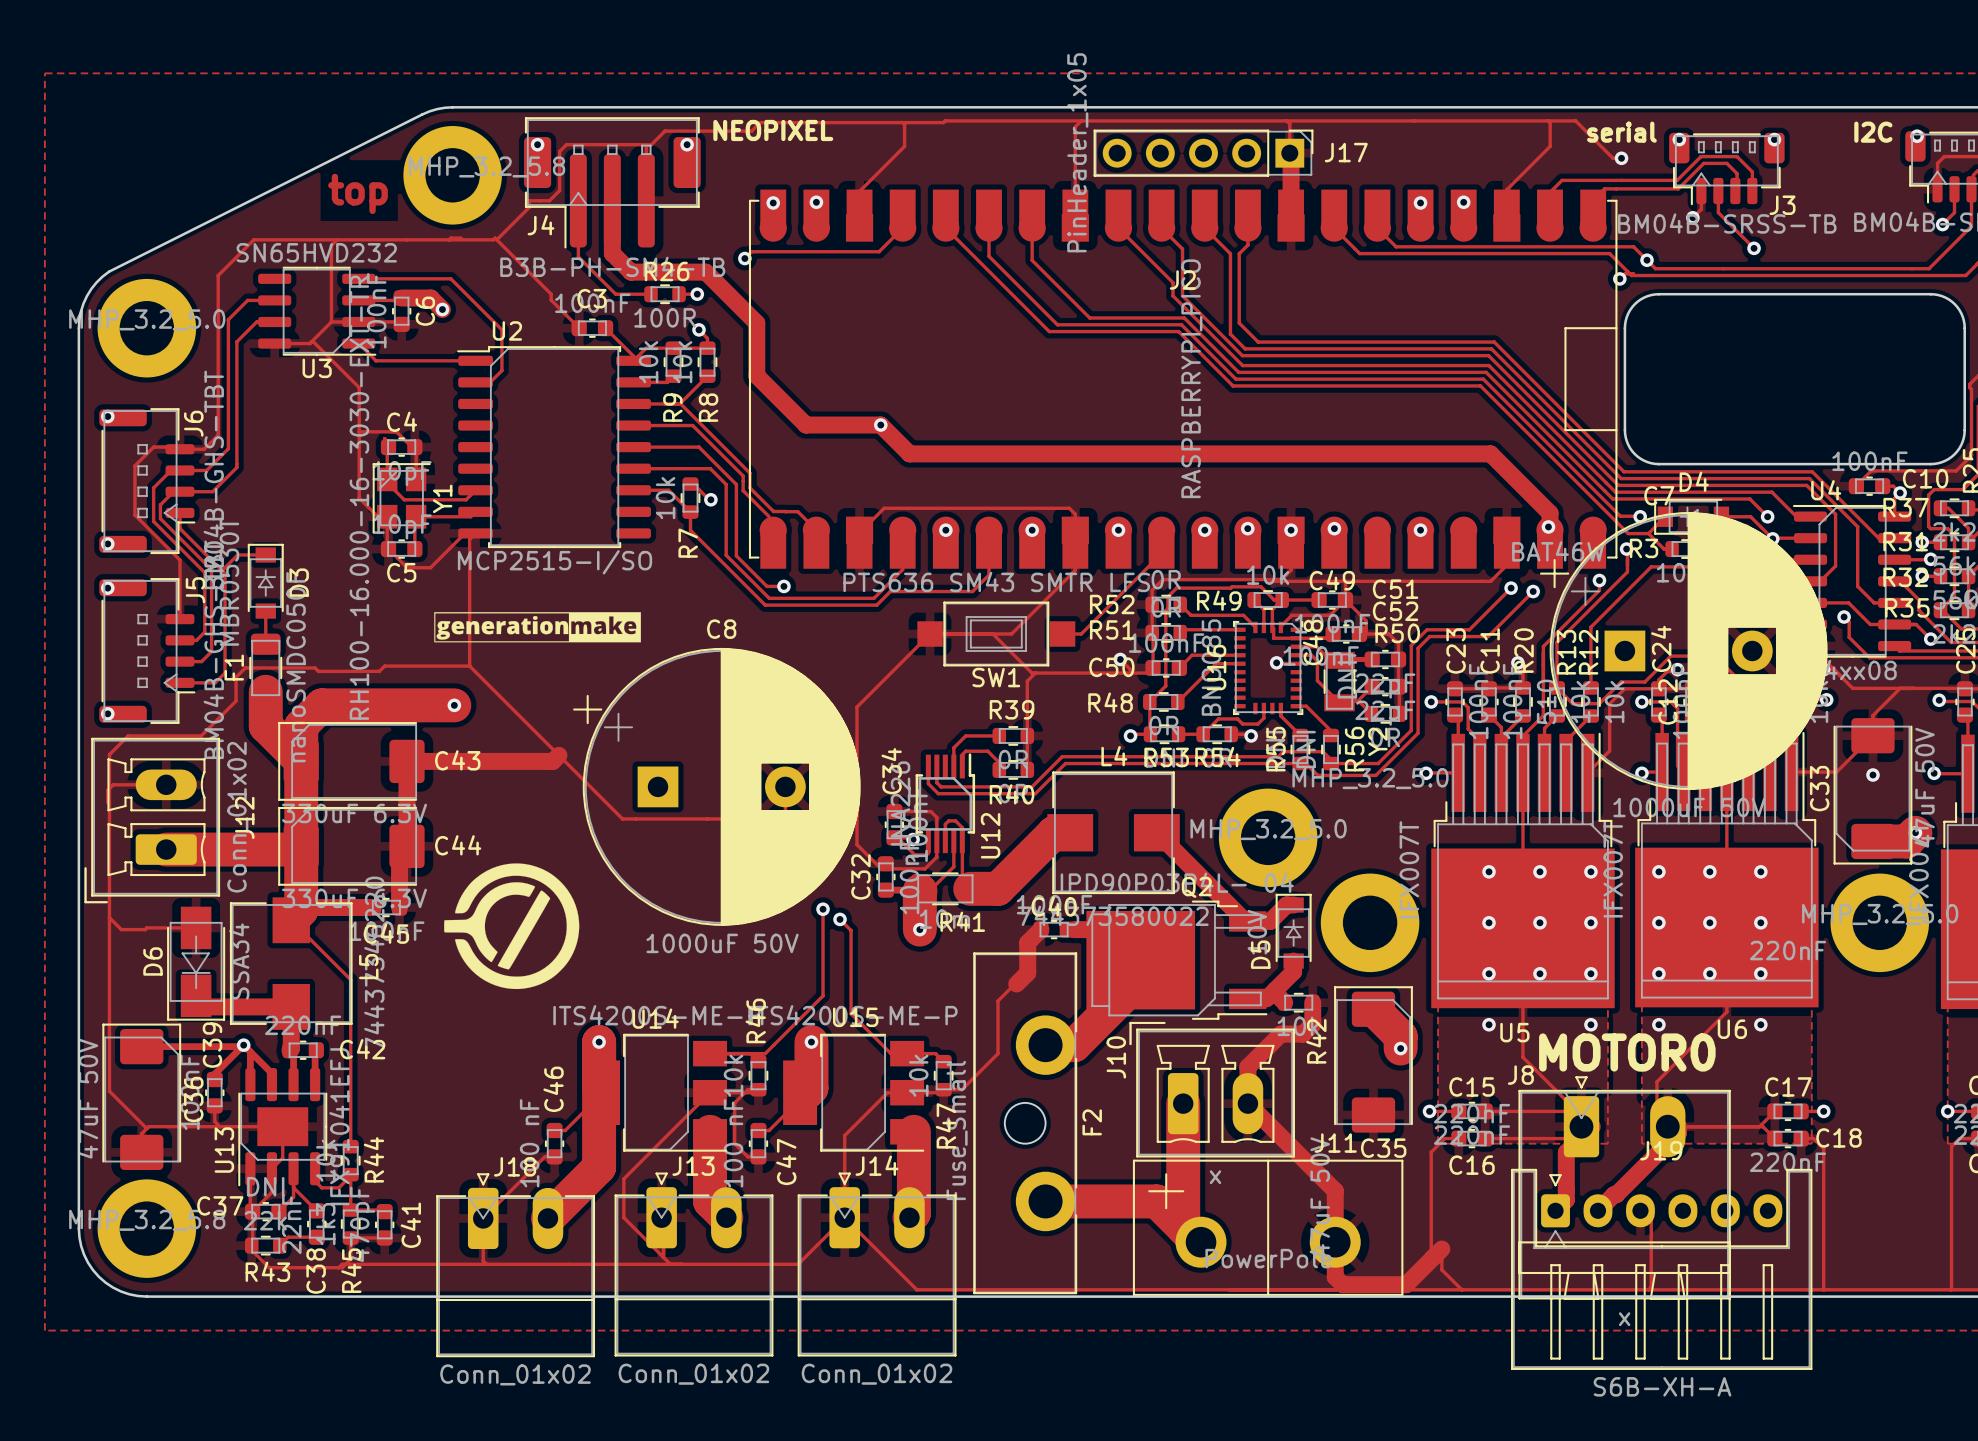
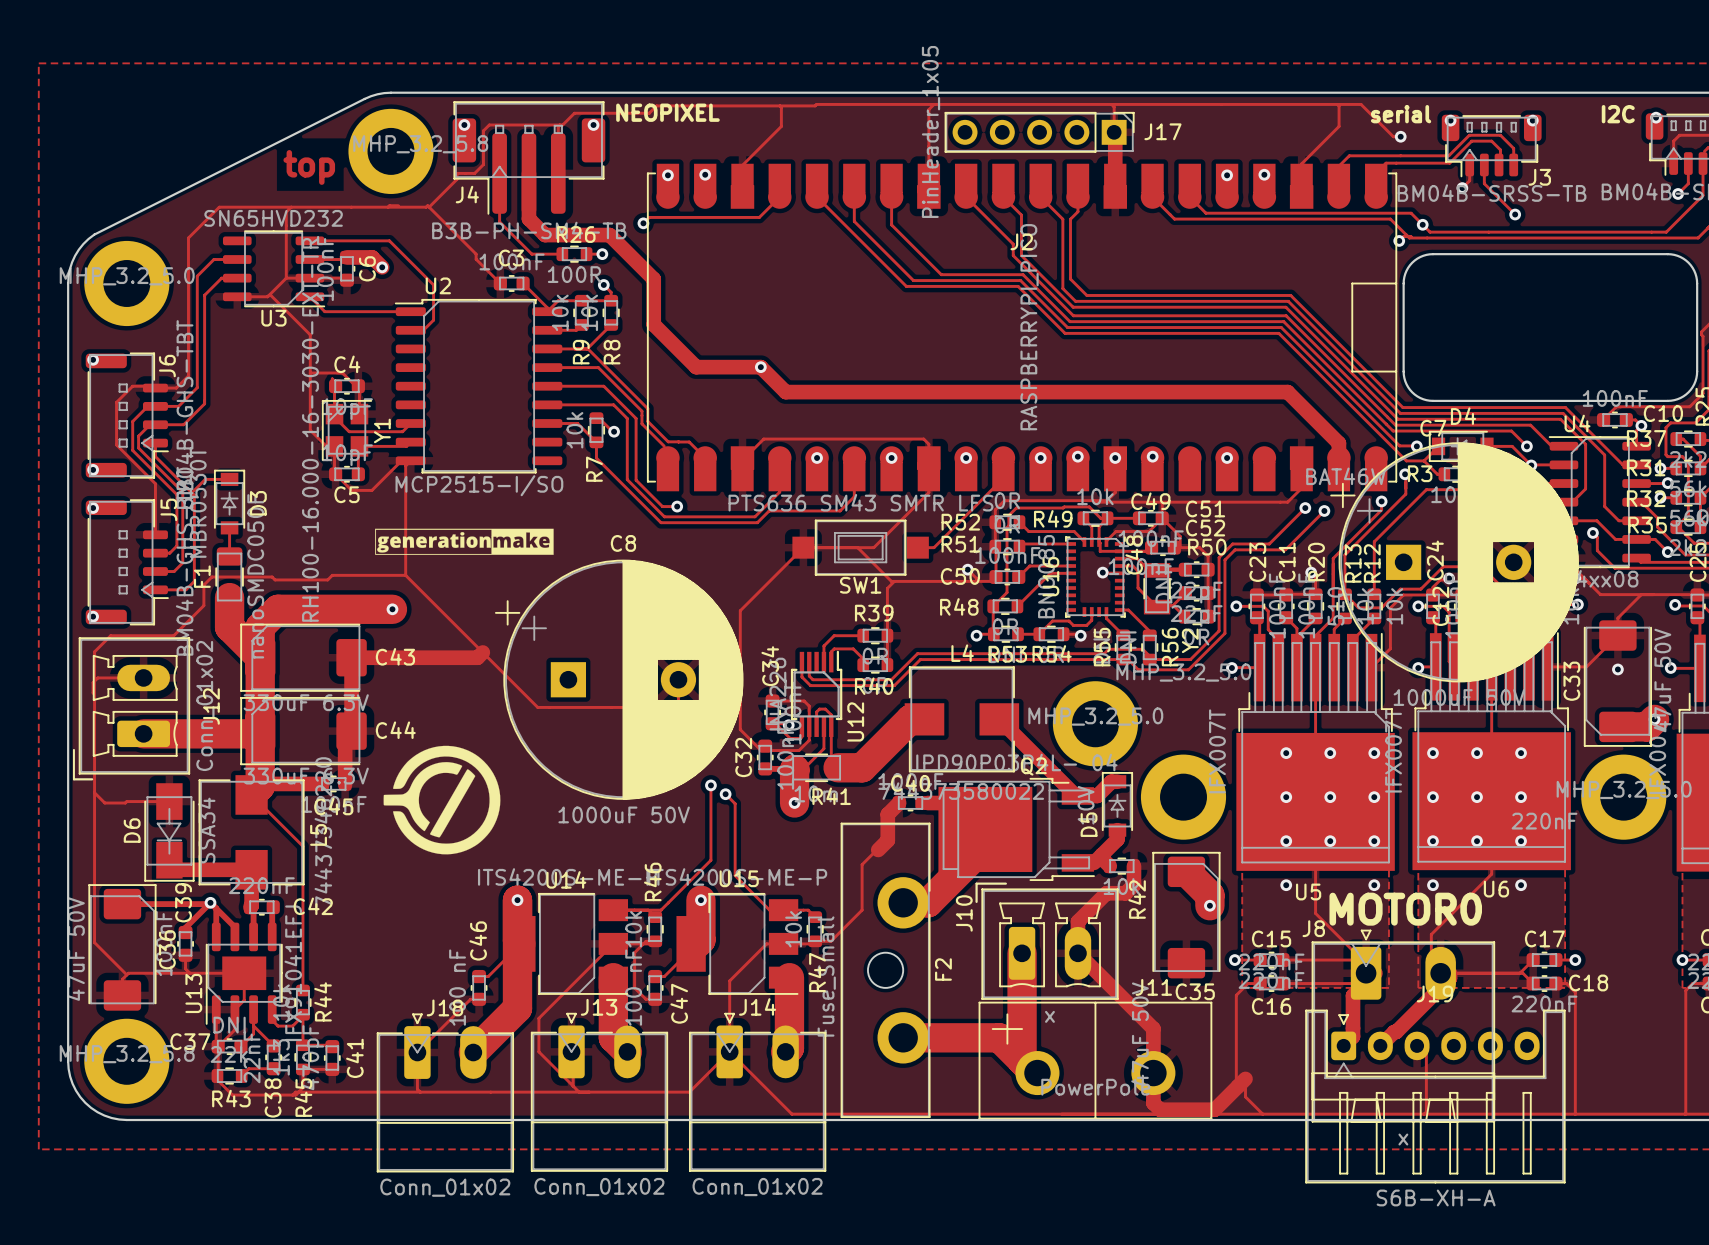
via: (1548, 526) -> none

